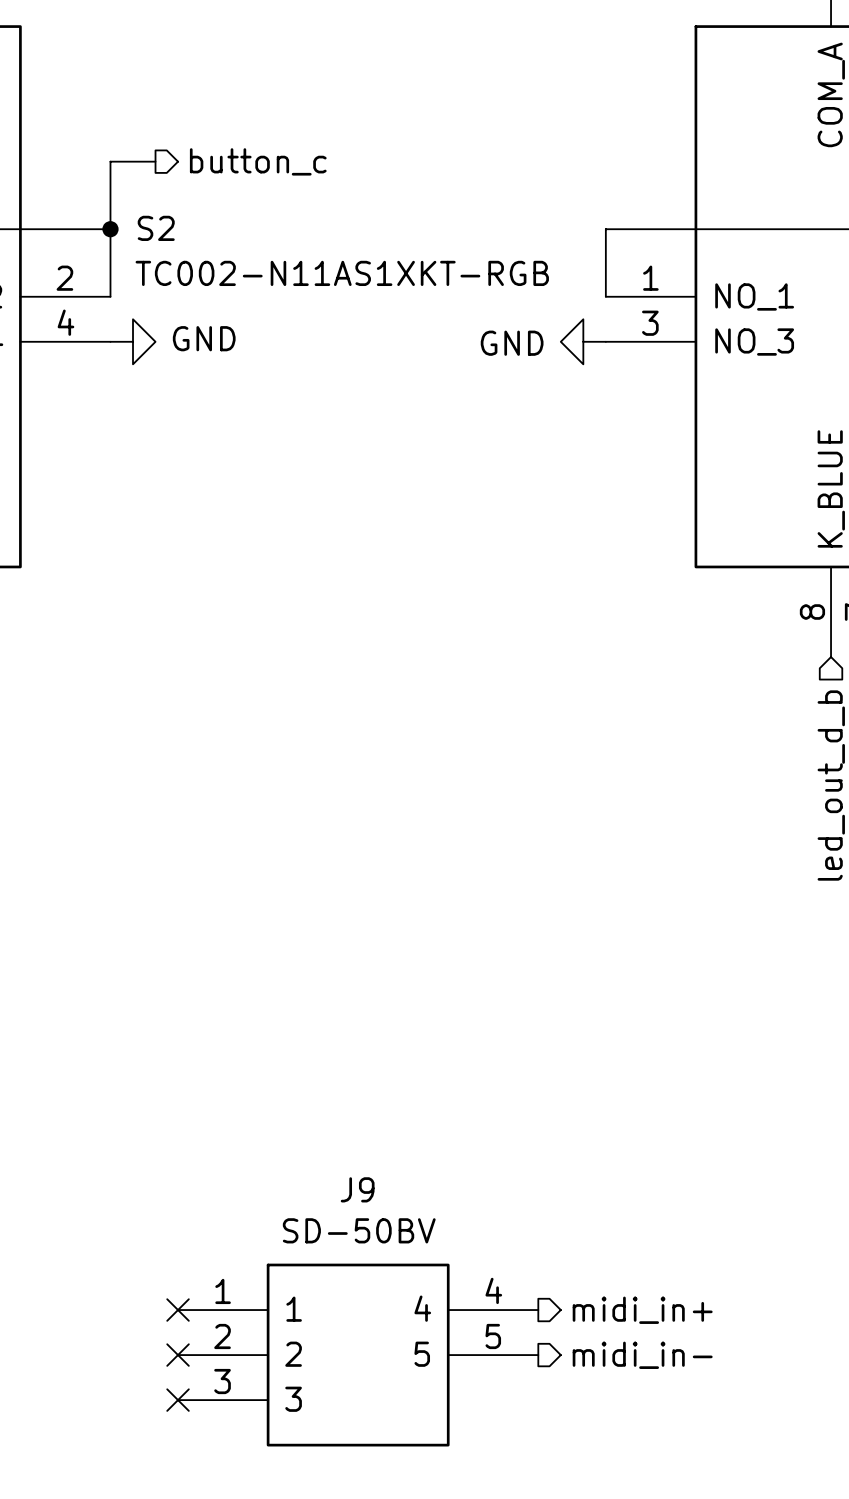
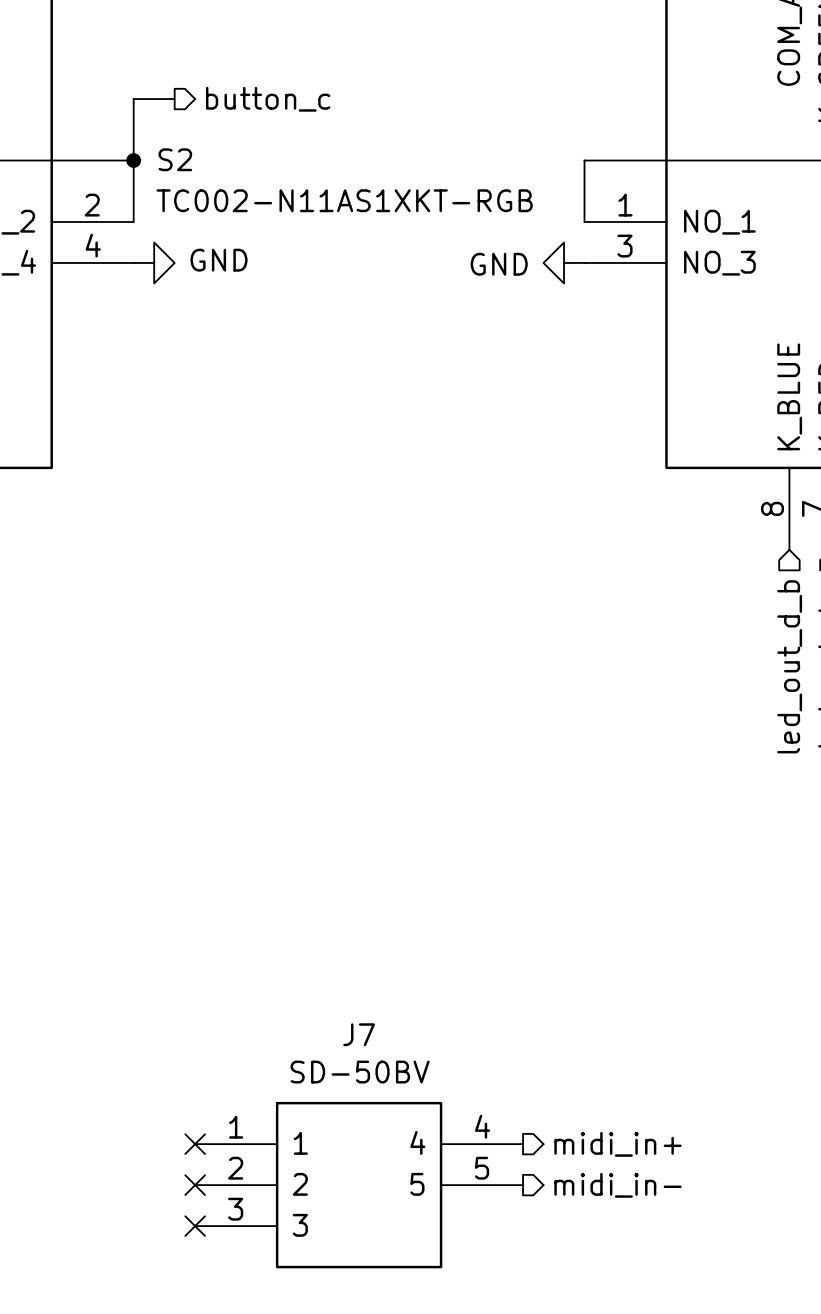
J9 name: J9 (357, 1189) -> J7 (359, 1034)

